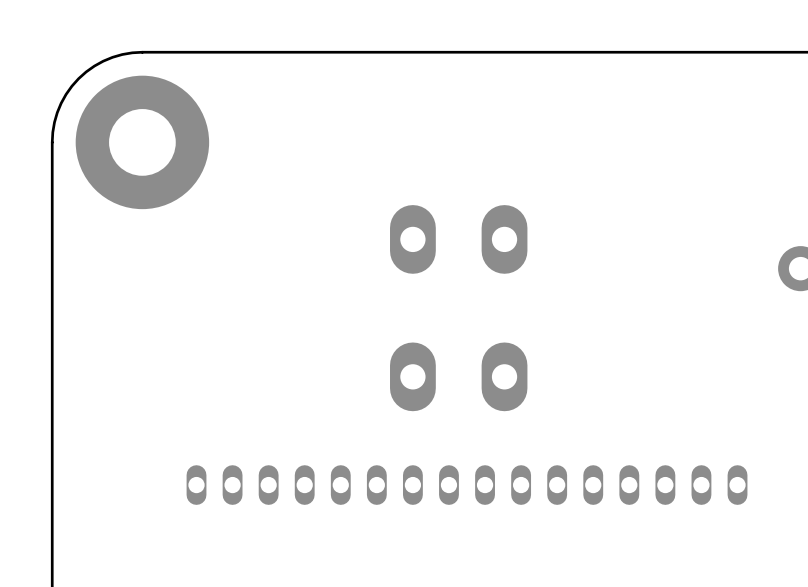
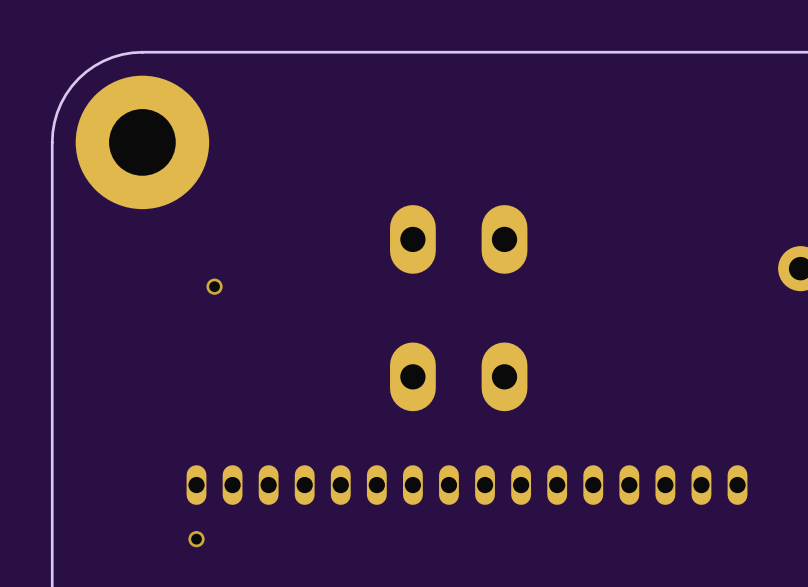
via: none -> (214, 286)
via: none -> (196, 539)

